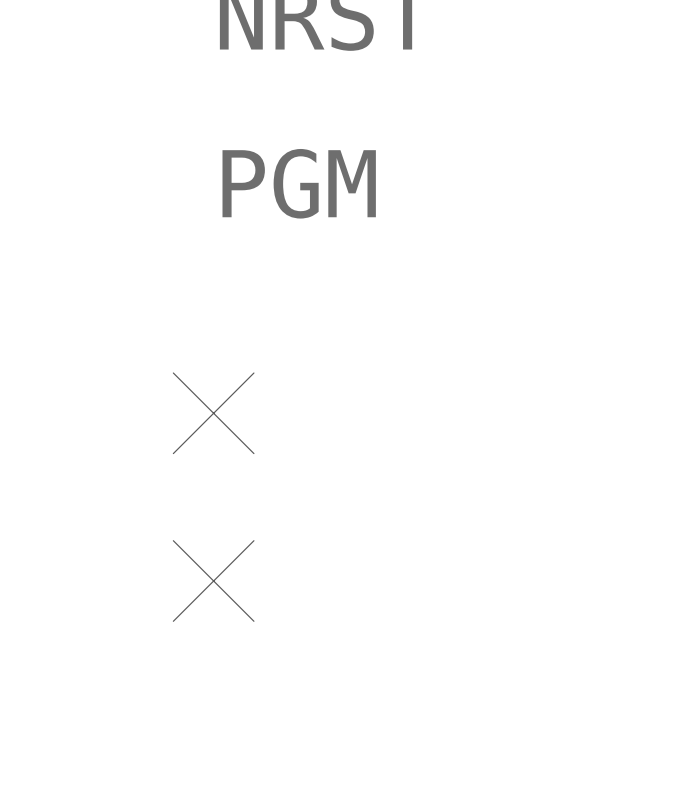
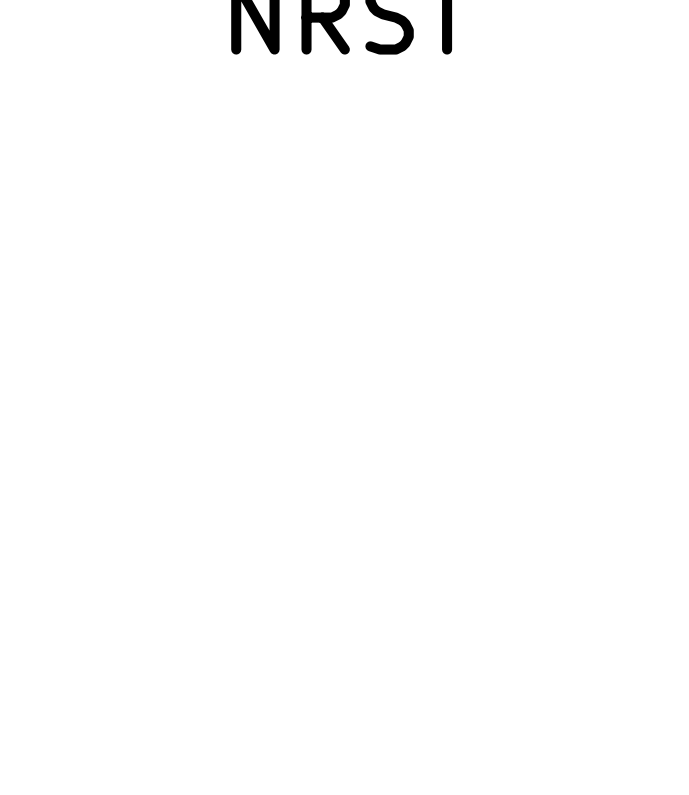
label: PGM (299, 183) -> none
no-connect mark: (213, 413) -> none
no-connect mark: (213, 581) -> none

